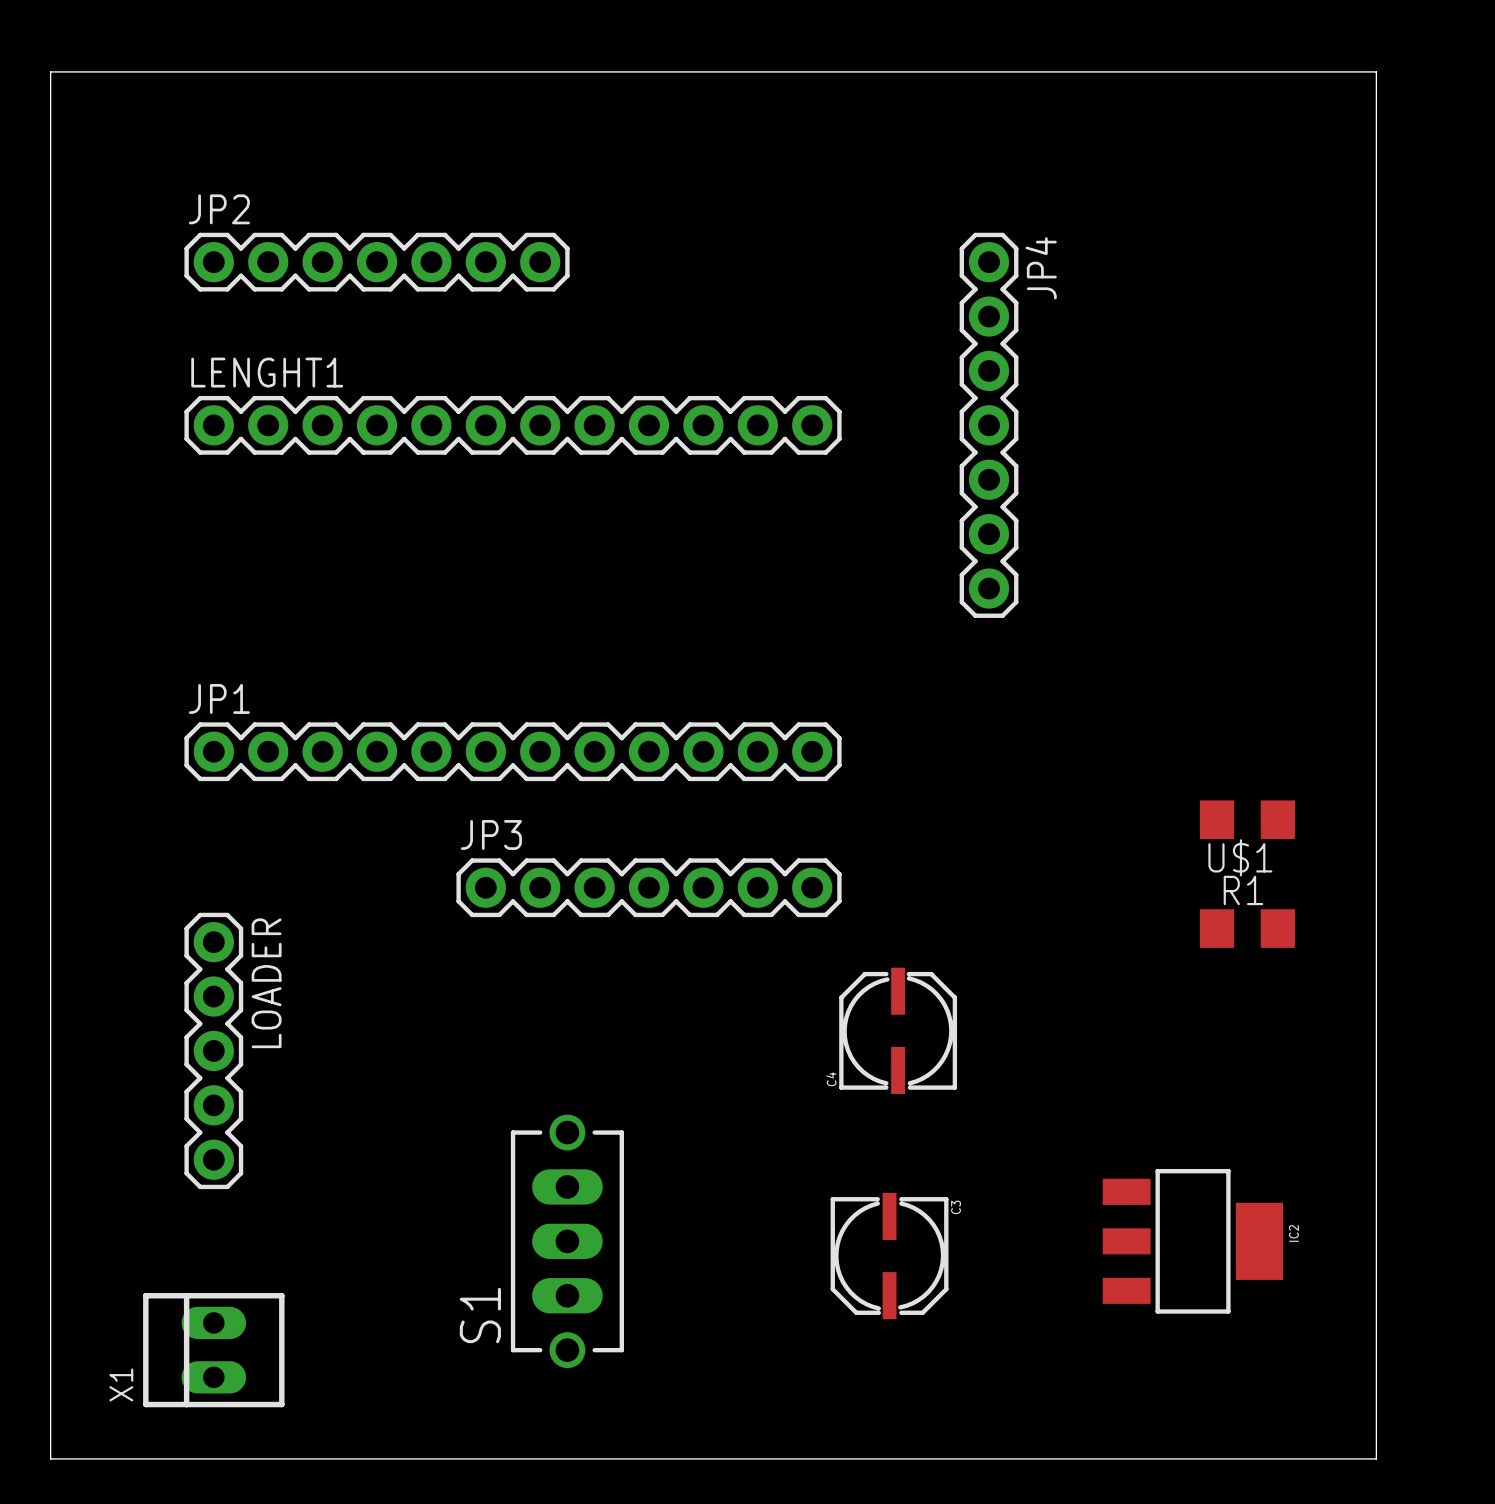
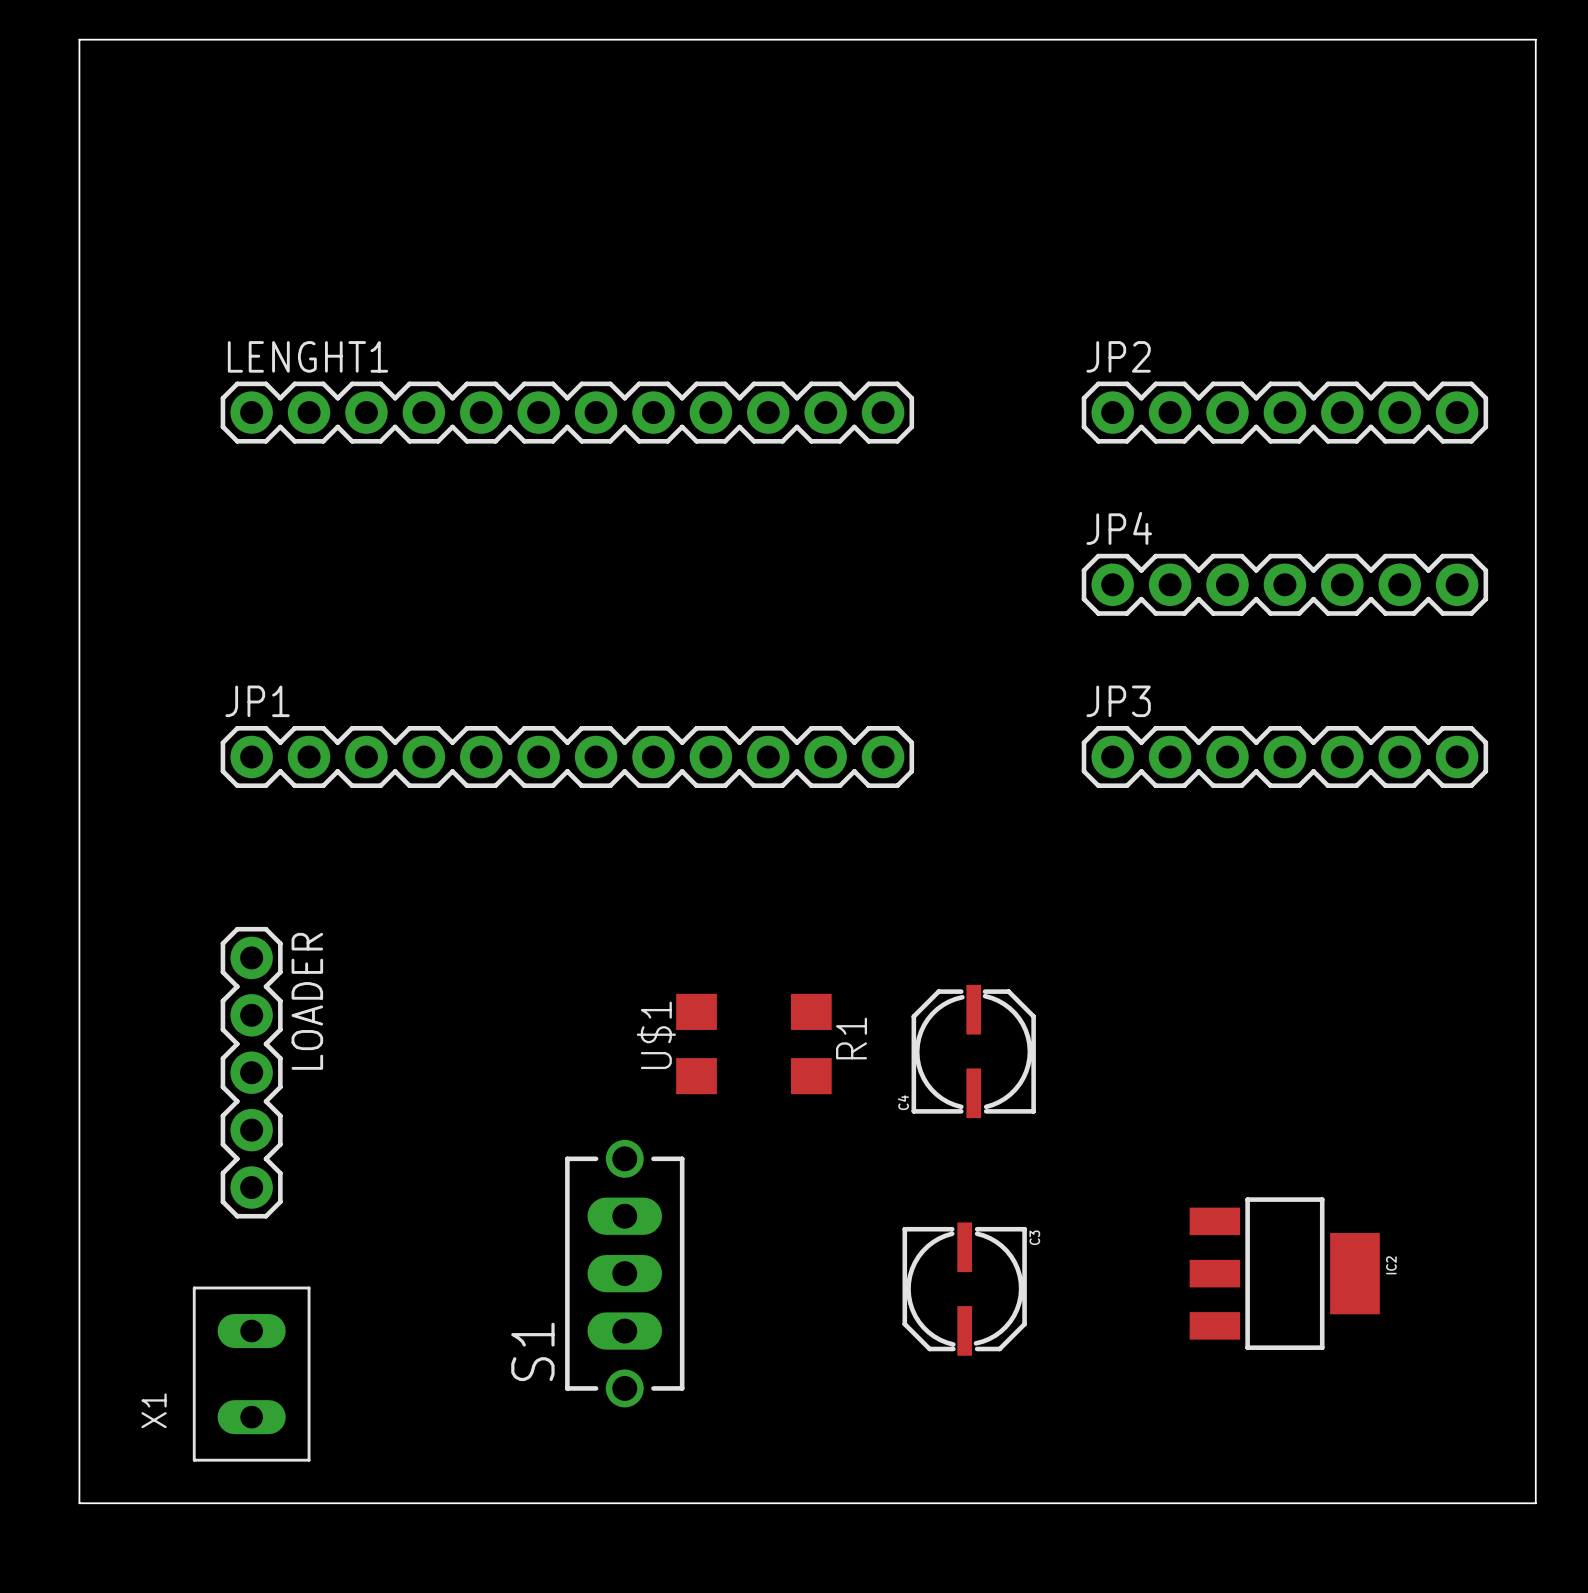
board edge: (1376, 71) (1376, 1458) -> (1478, 39) (1535, 39) (1535, 1503) (1478, 1503)
JP2 position: (377, 262) -> (1284, 412)
JP4 name position: JP4 (1041, 268) -> JP4 (1119, 528)
JP4 rotation: 0° (989, 425) -> 90° clockwise (1284, 584)
JP4 position: (989, 425) -> (1284, 584)
U$1 rotation: 0° (1247, 819) -> 90° clockwise (696, 1044)
U$1 position: (1247, 819) -> (696, 1044)
JP3 position: (649, 887) -> (1284, 756)
R1 rotation: 0° (1247, 928) -> 90° clockwise (811, 1044)
R1 position: (1247, 928) -> (811, 1044)
X1 footprint: [143, 1293, 285, 1408] -> [192, 1286, 311, 1462]

